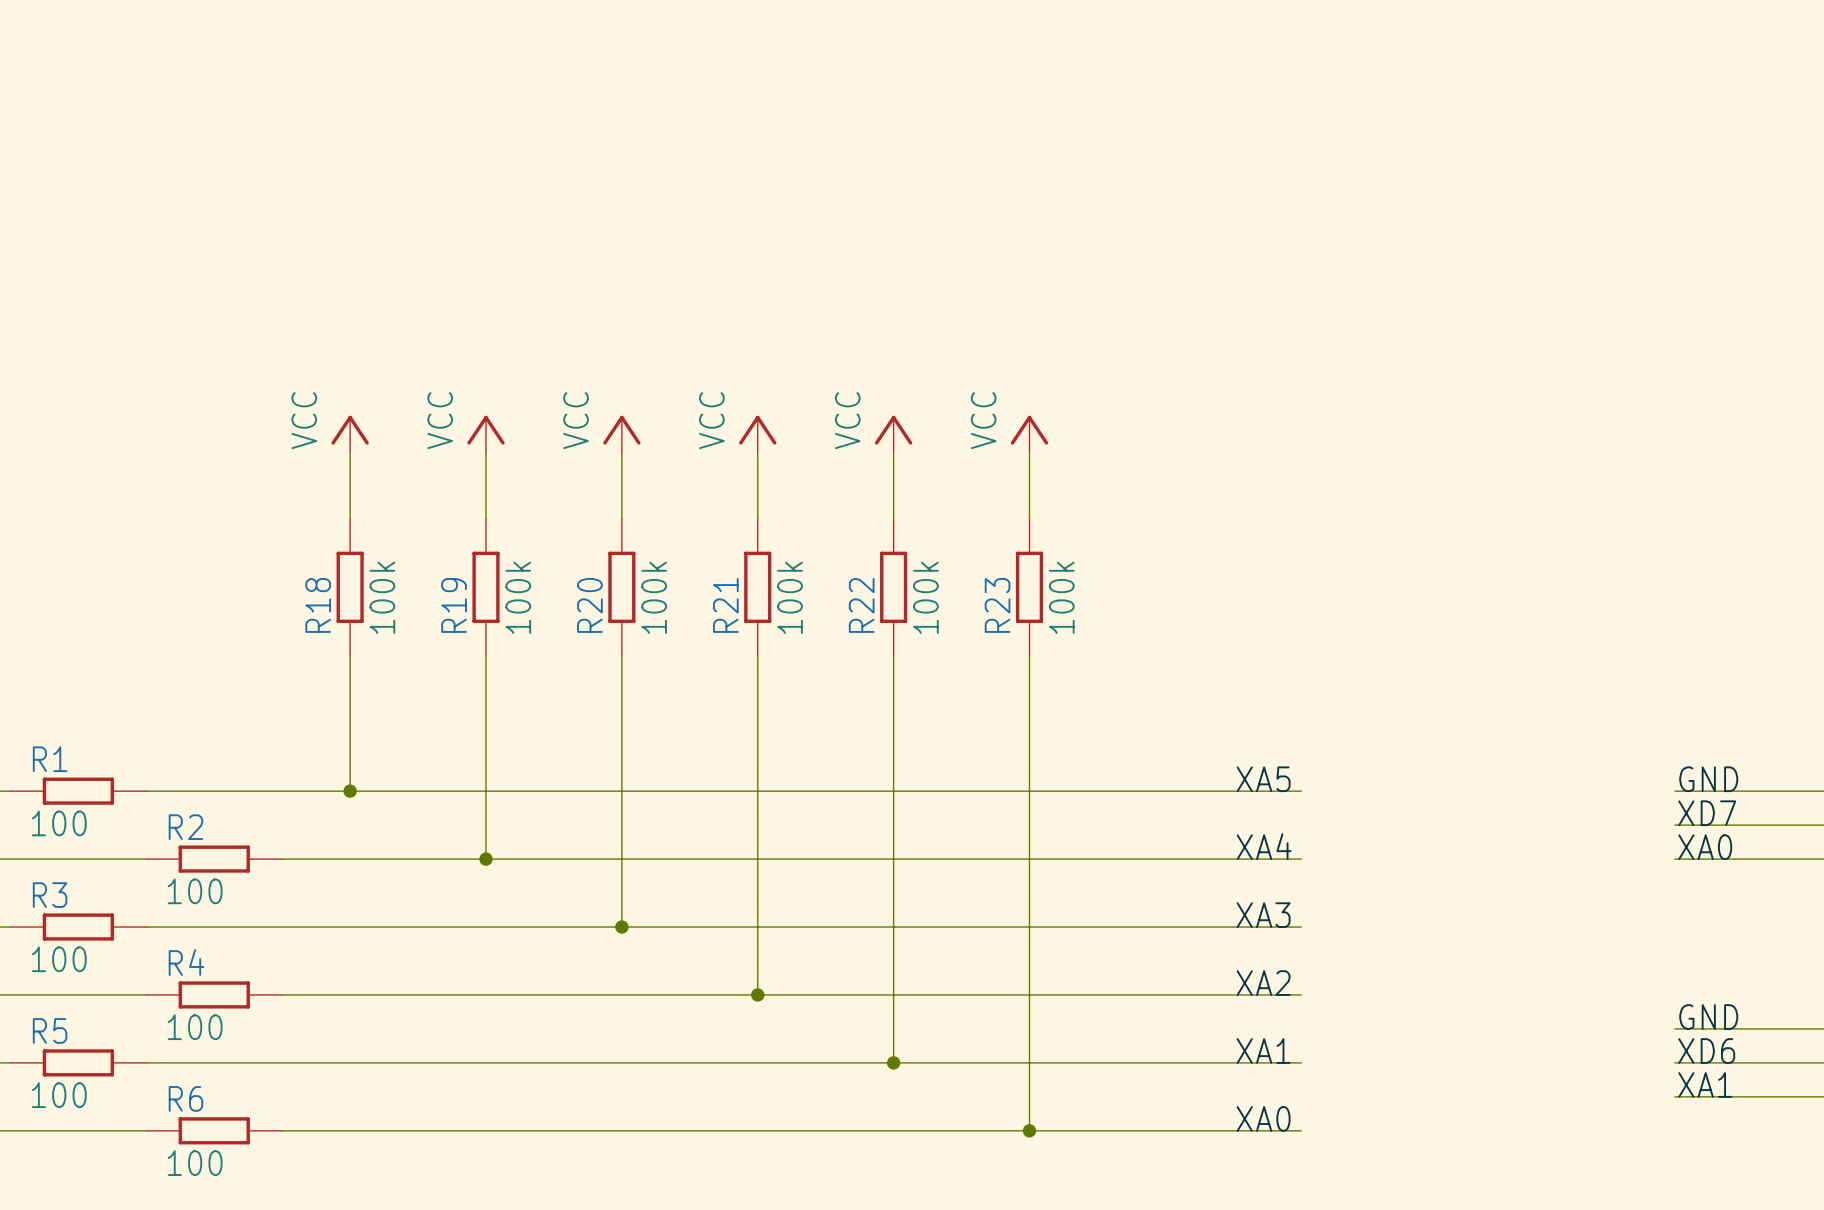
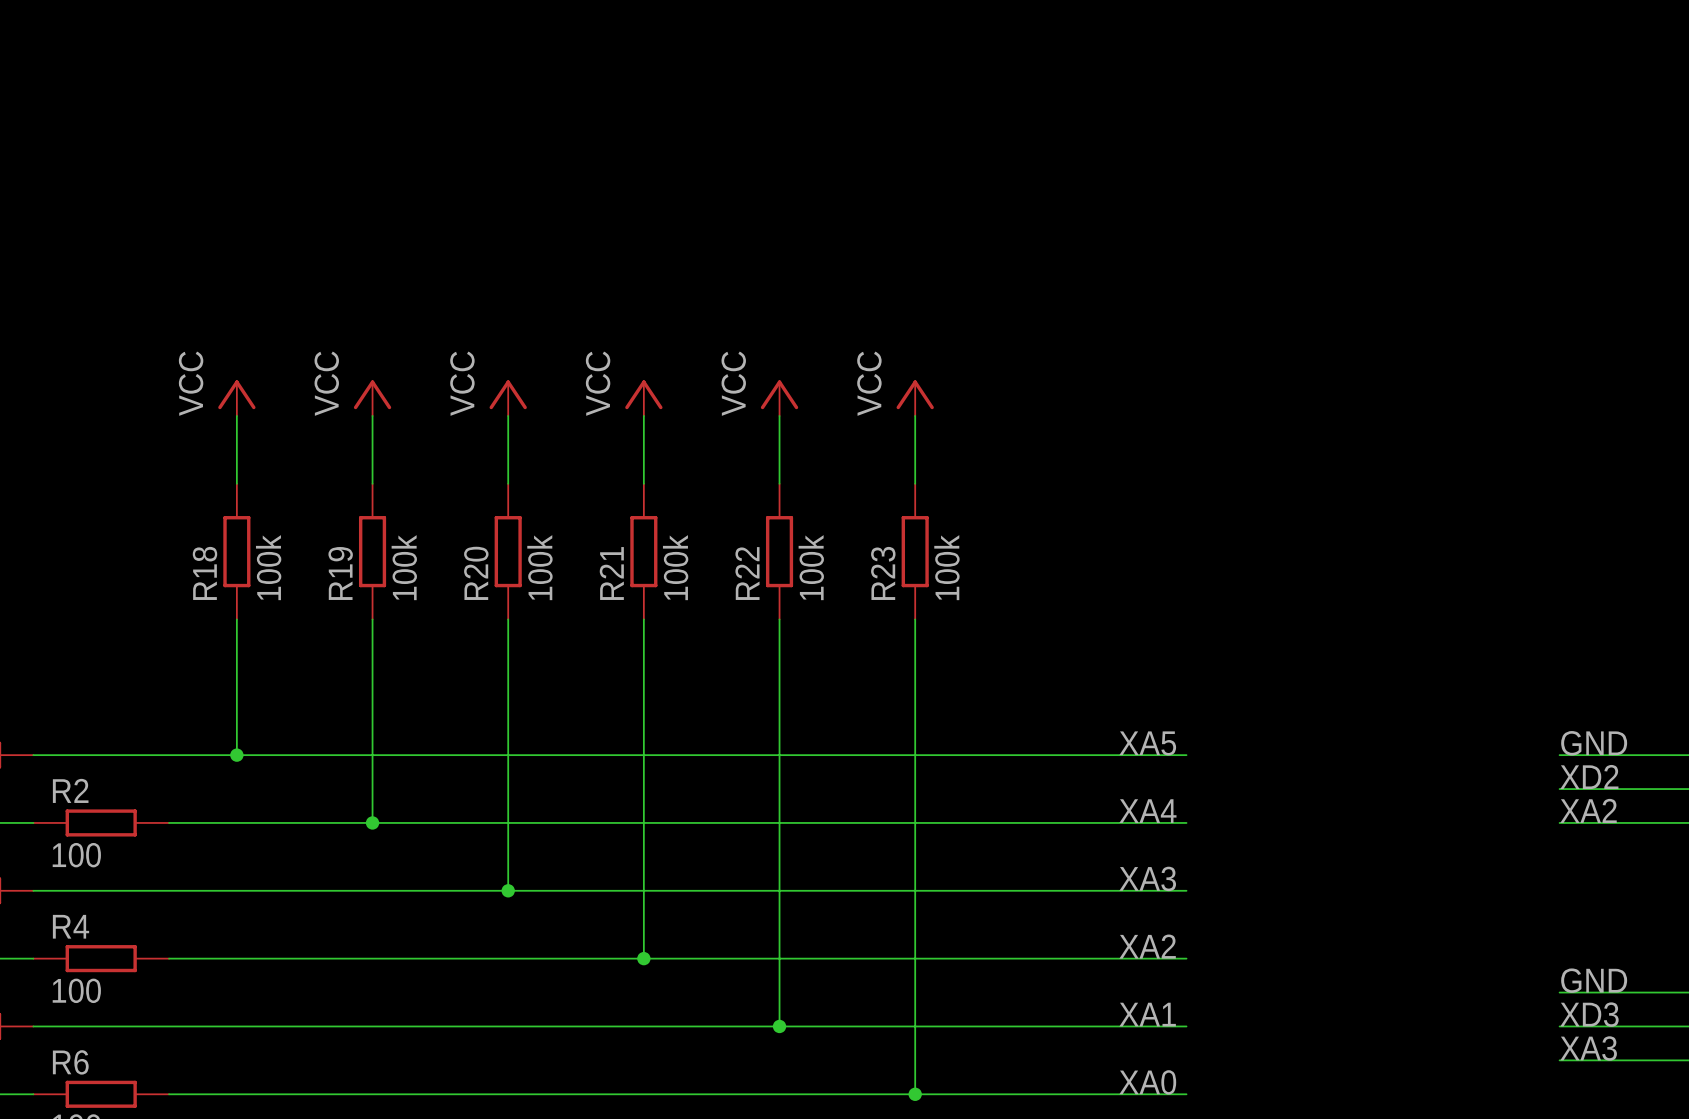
label: XD7 (1707, 813) -> XD2 (1589, 777)
label: XA0 (1705, 847) -> XA2 (1588, 810)
label: XD6 (1706, 1051) -> XD3 (1589, 1014)
label: XA1 (1705, 1084) -> XA3 (1588, 1048)

